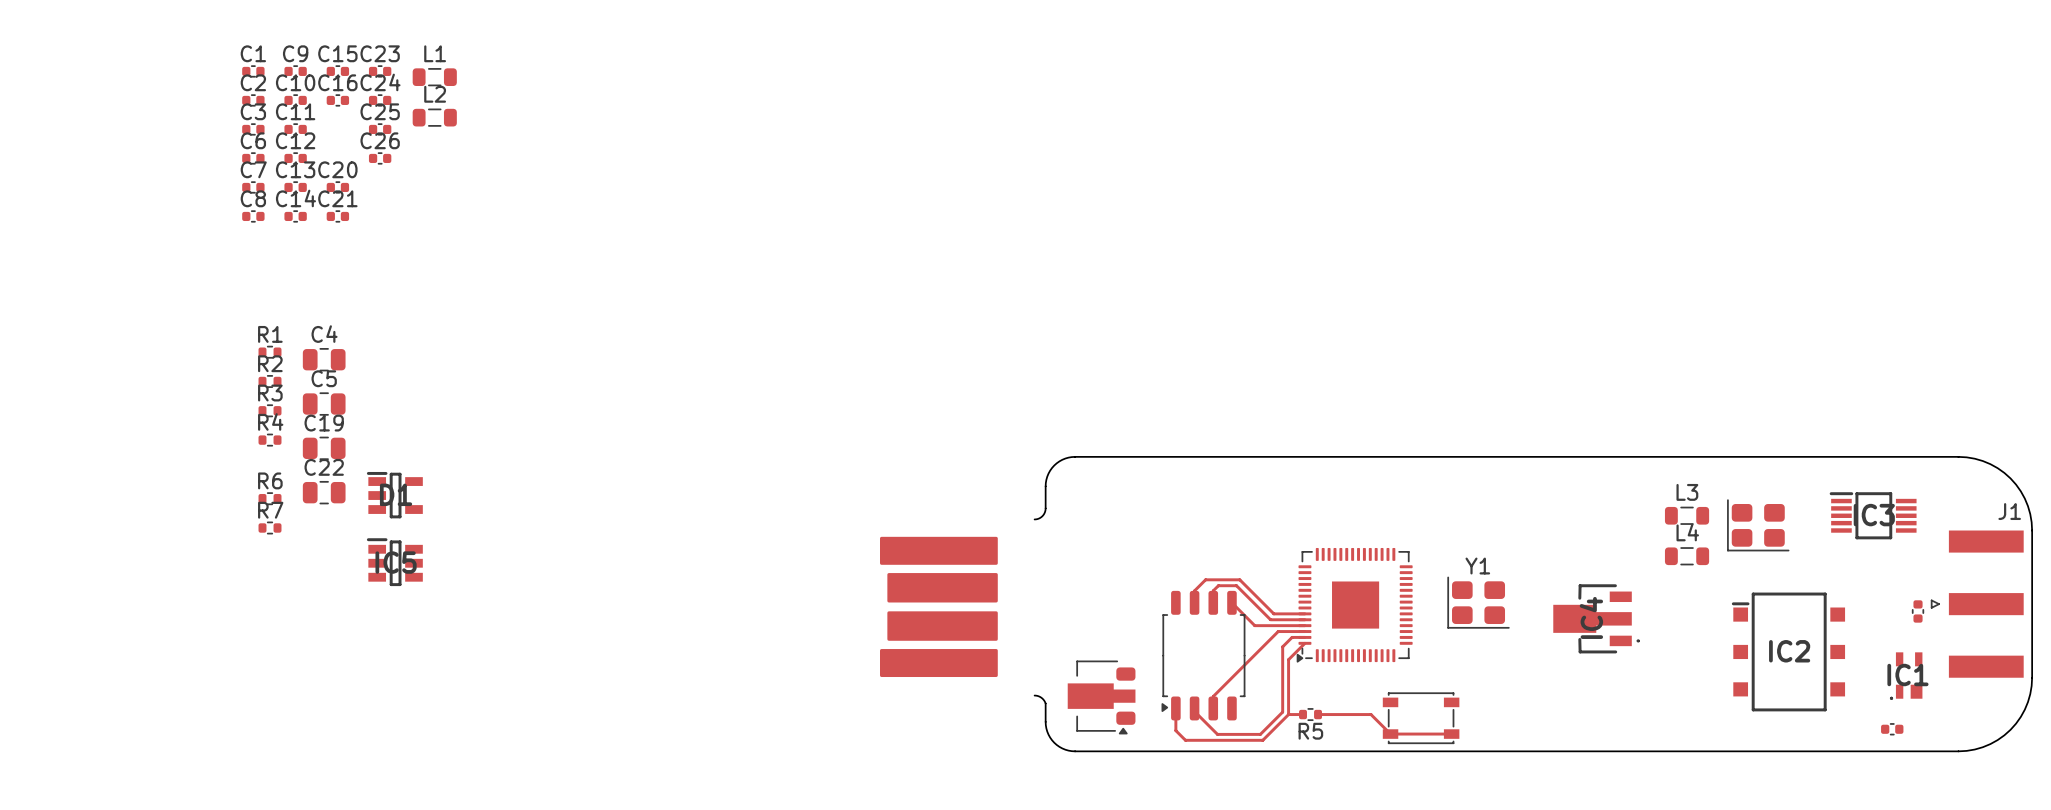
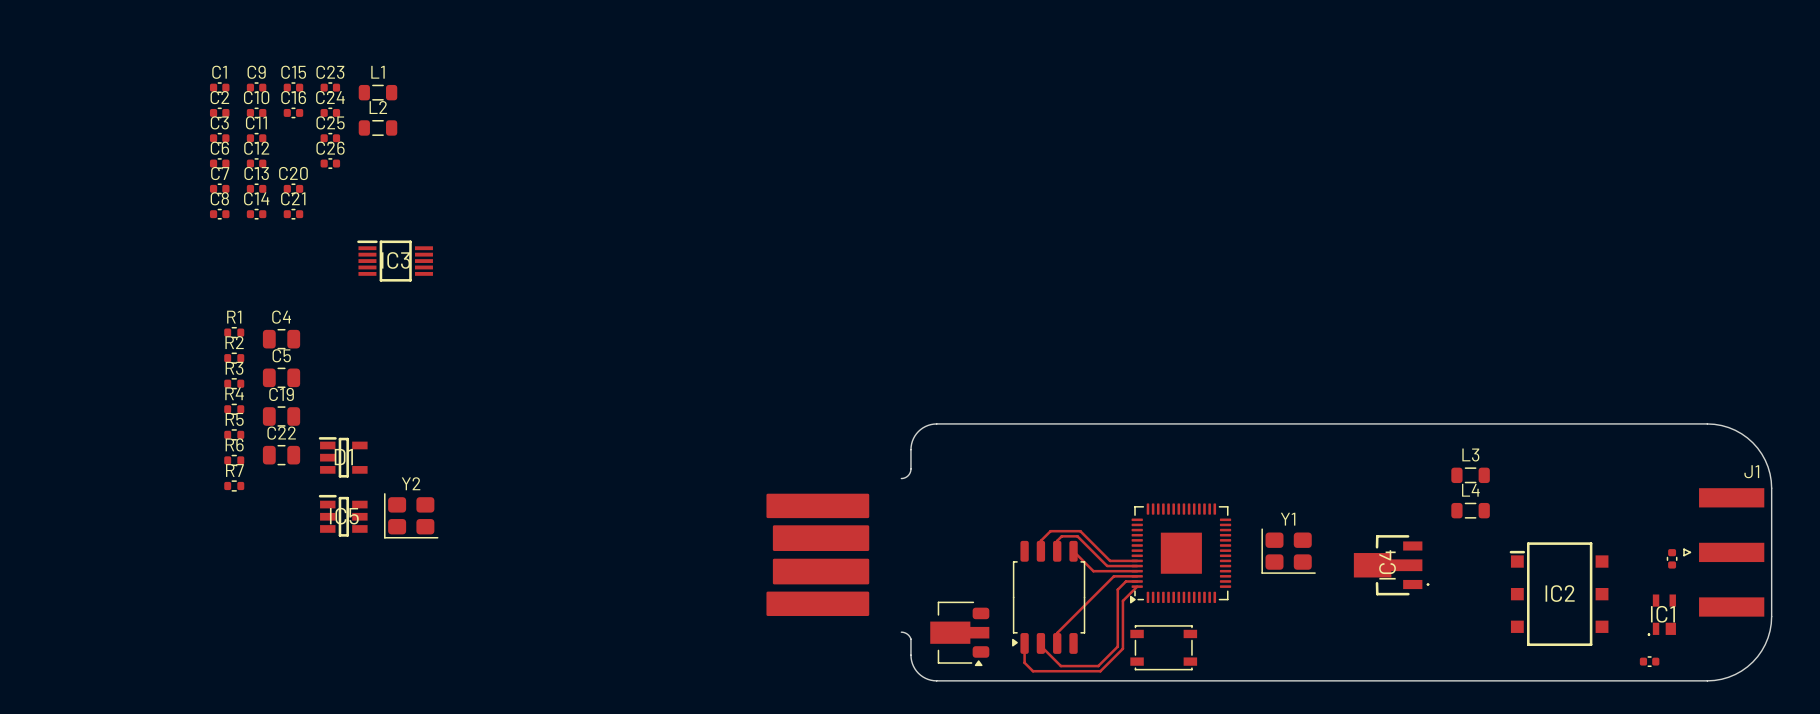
IC3 position: (1873, 515) -> (395, 261)
part: (1758, 525) -> none
Y2: none -> (411, 515)
track: (1288, 714) (1303, 714) -> none
R5 position: (1310, 714) -> (234, 434)
track: (1318, 714) (1371, 714) (1390, 734) (1451, 734) -> none
part position: (1421, 718) -> (1163, 647)
R5 name position: R5 (1310, 731) -> R5 (234, 419)

